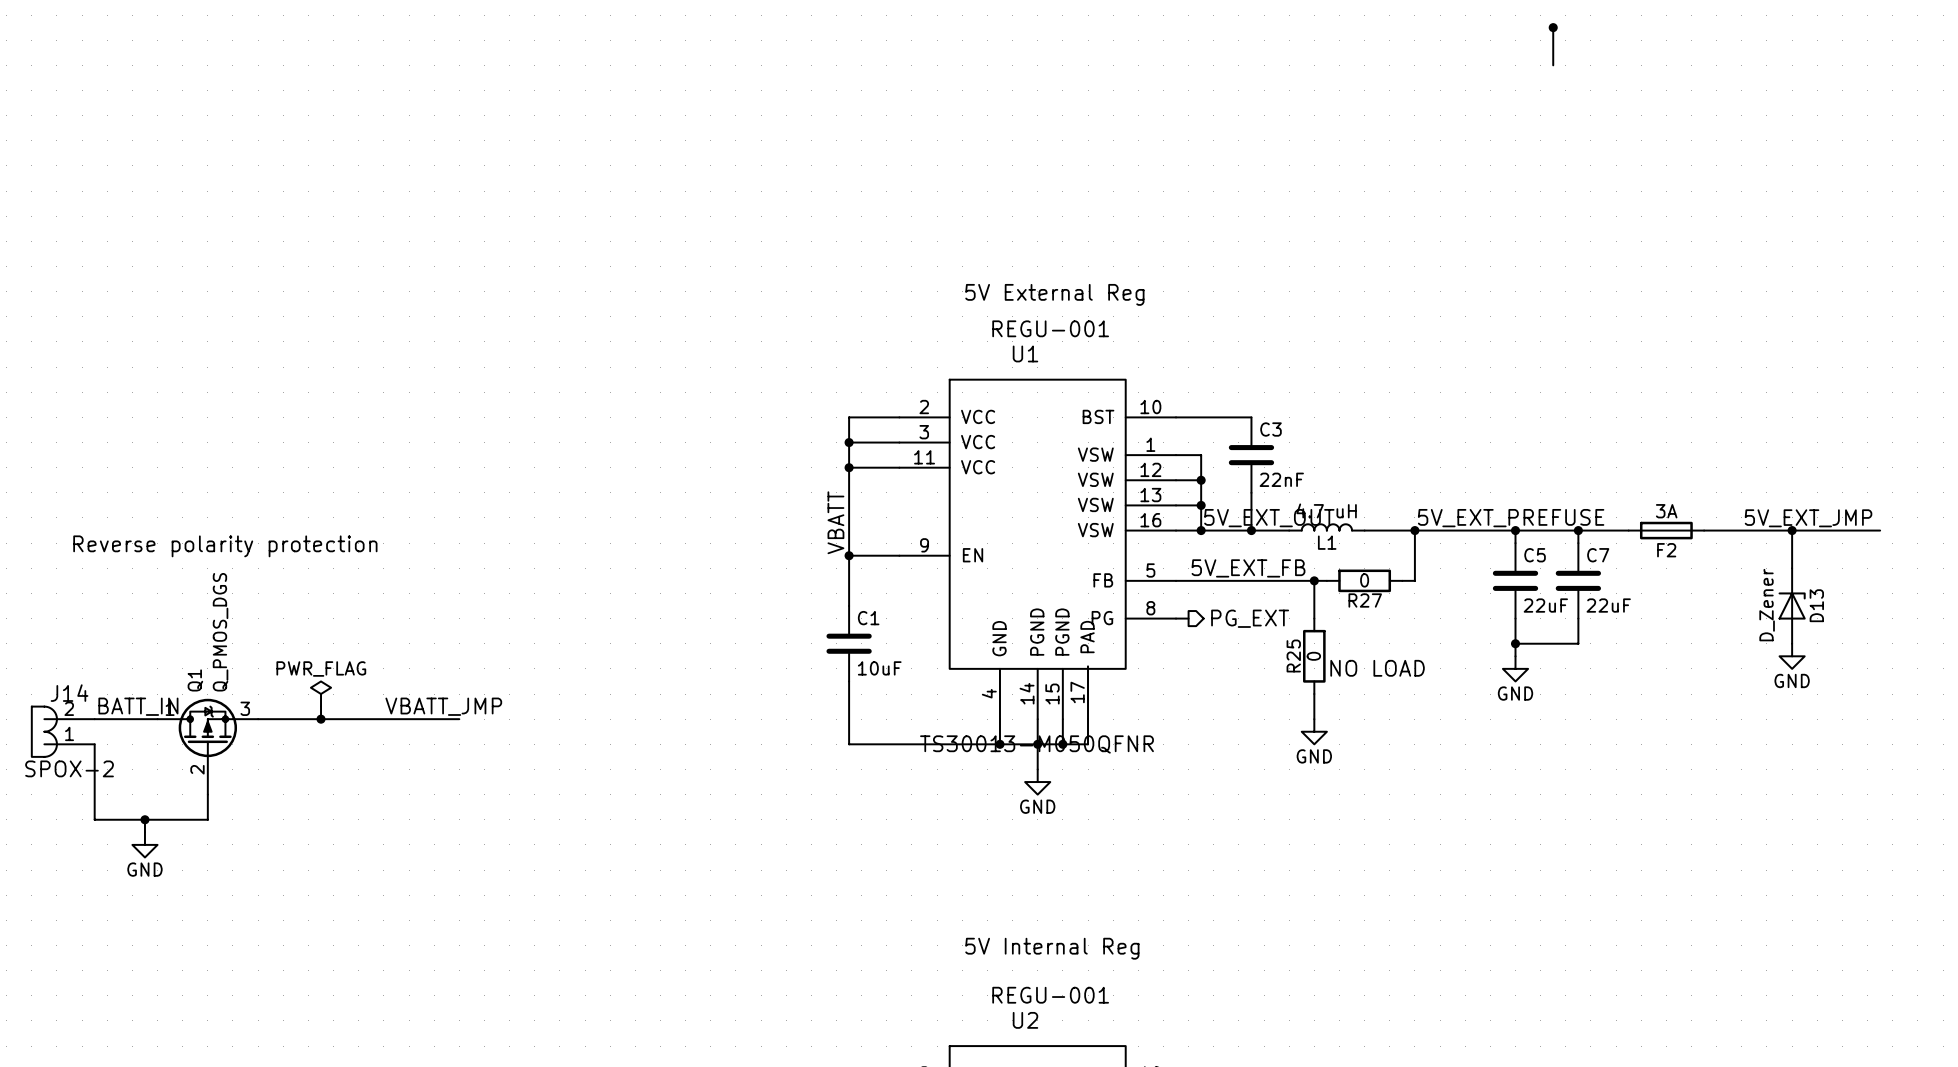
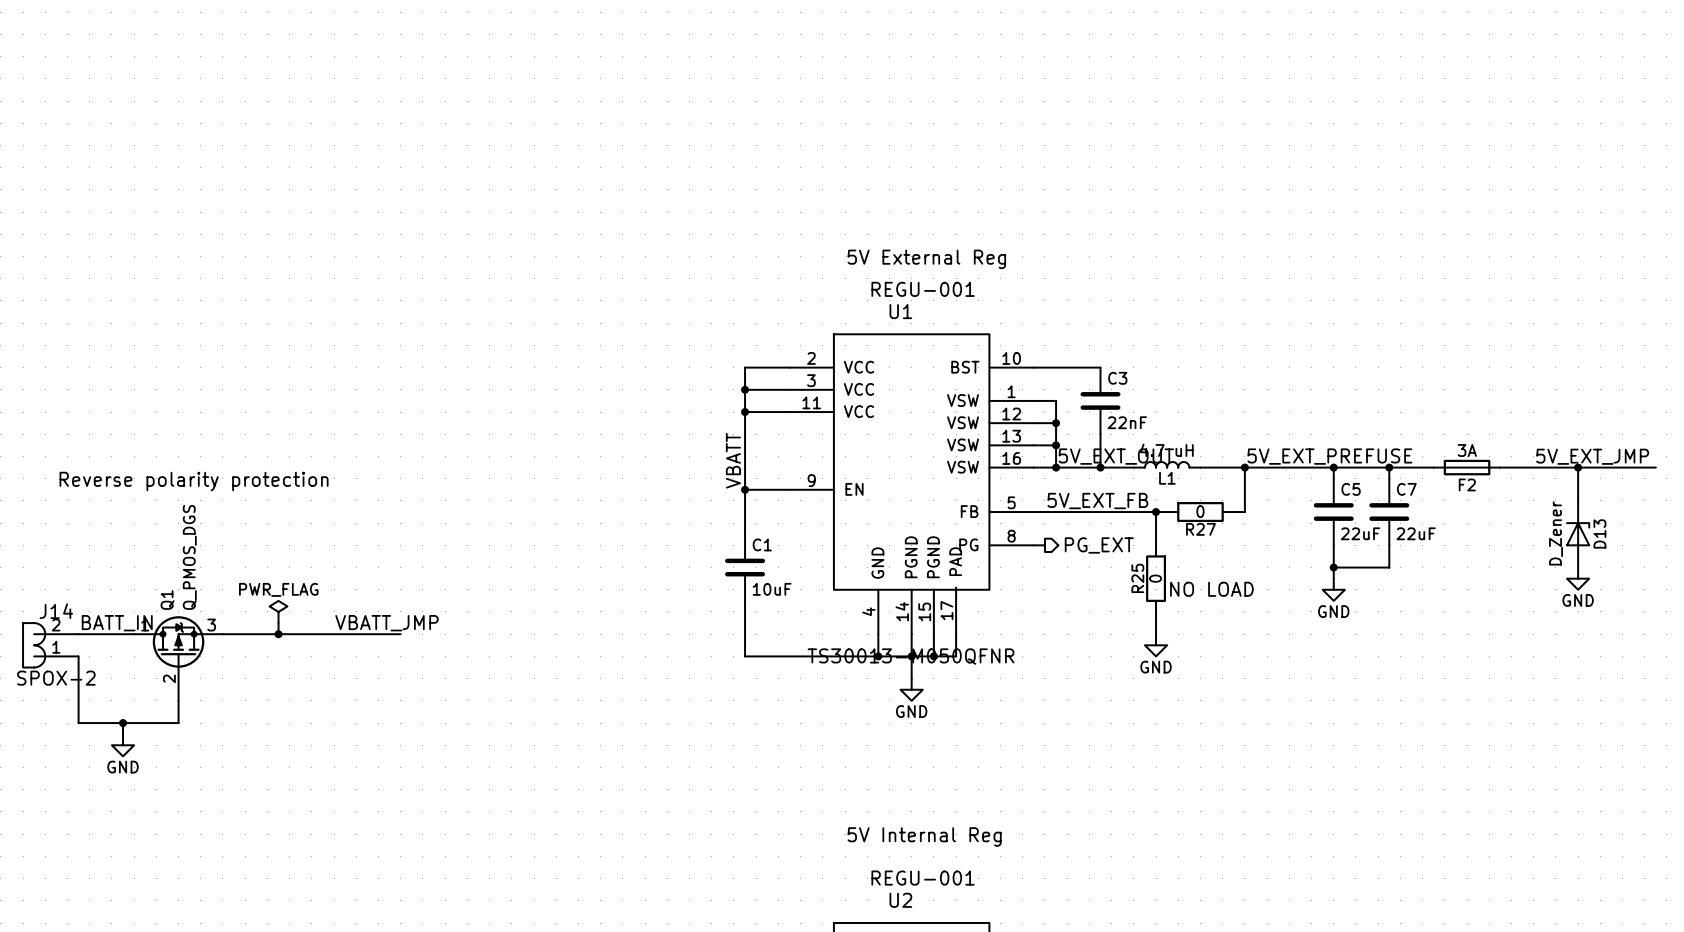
wire: (1553, 27) (1553, 65) -> none
junction: (1553, 27) -> none

